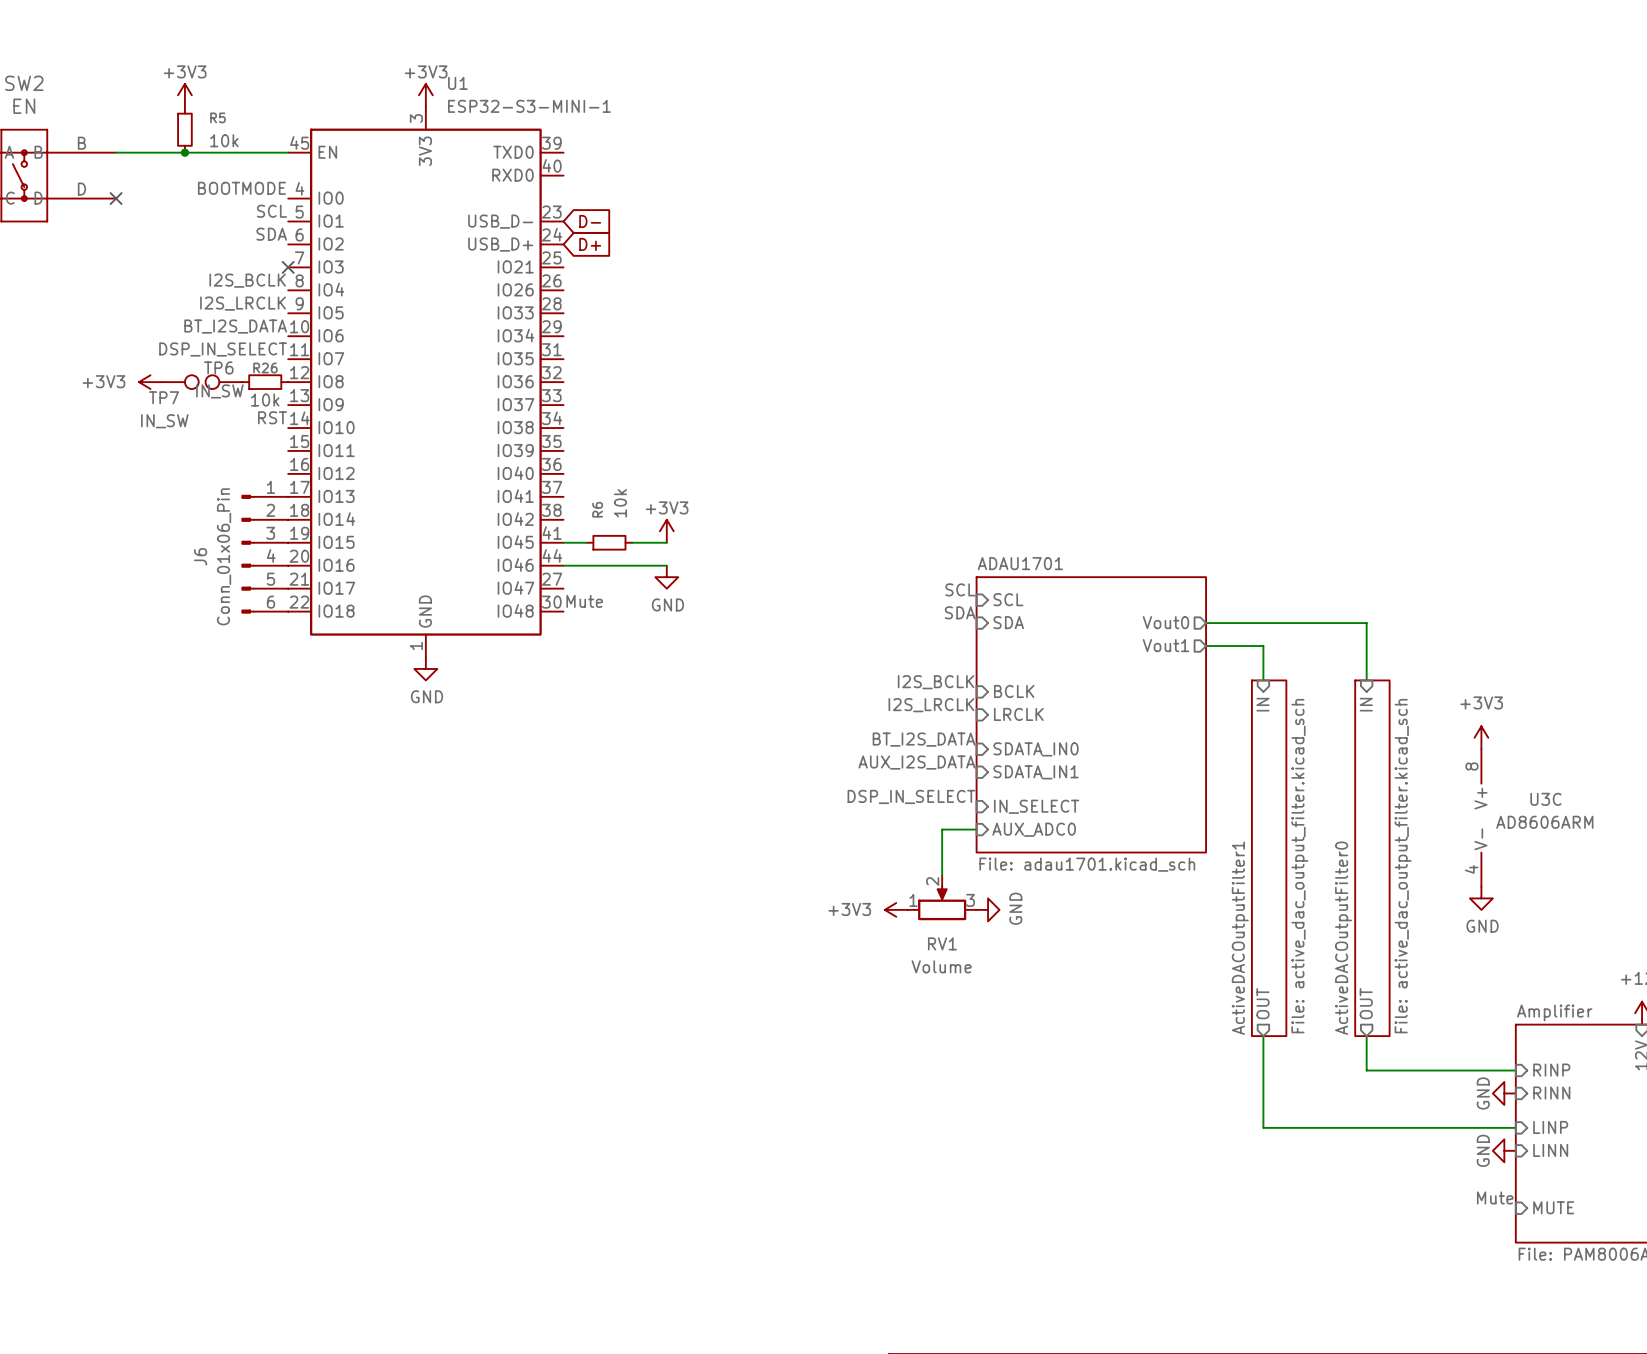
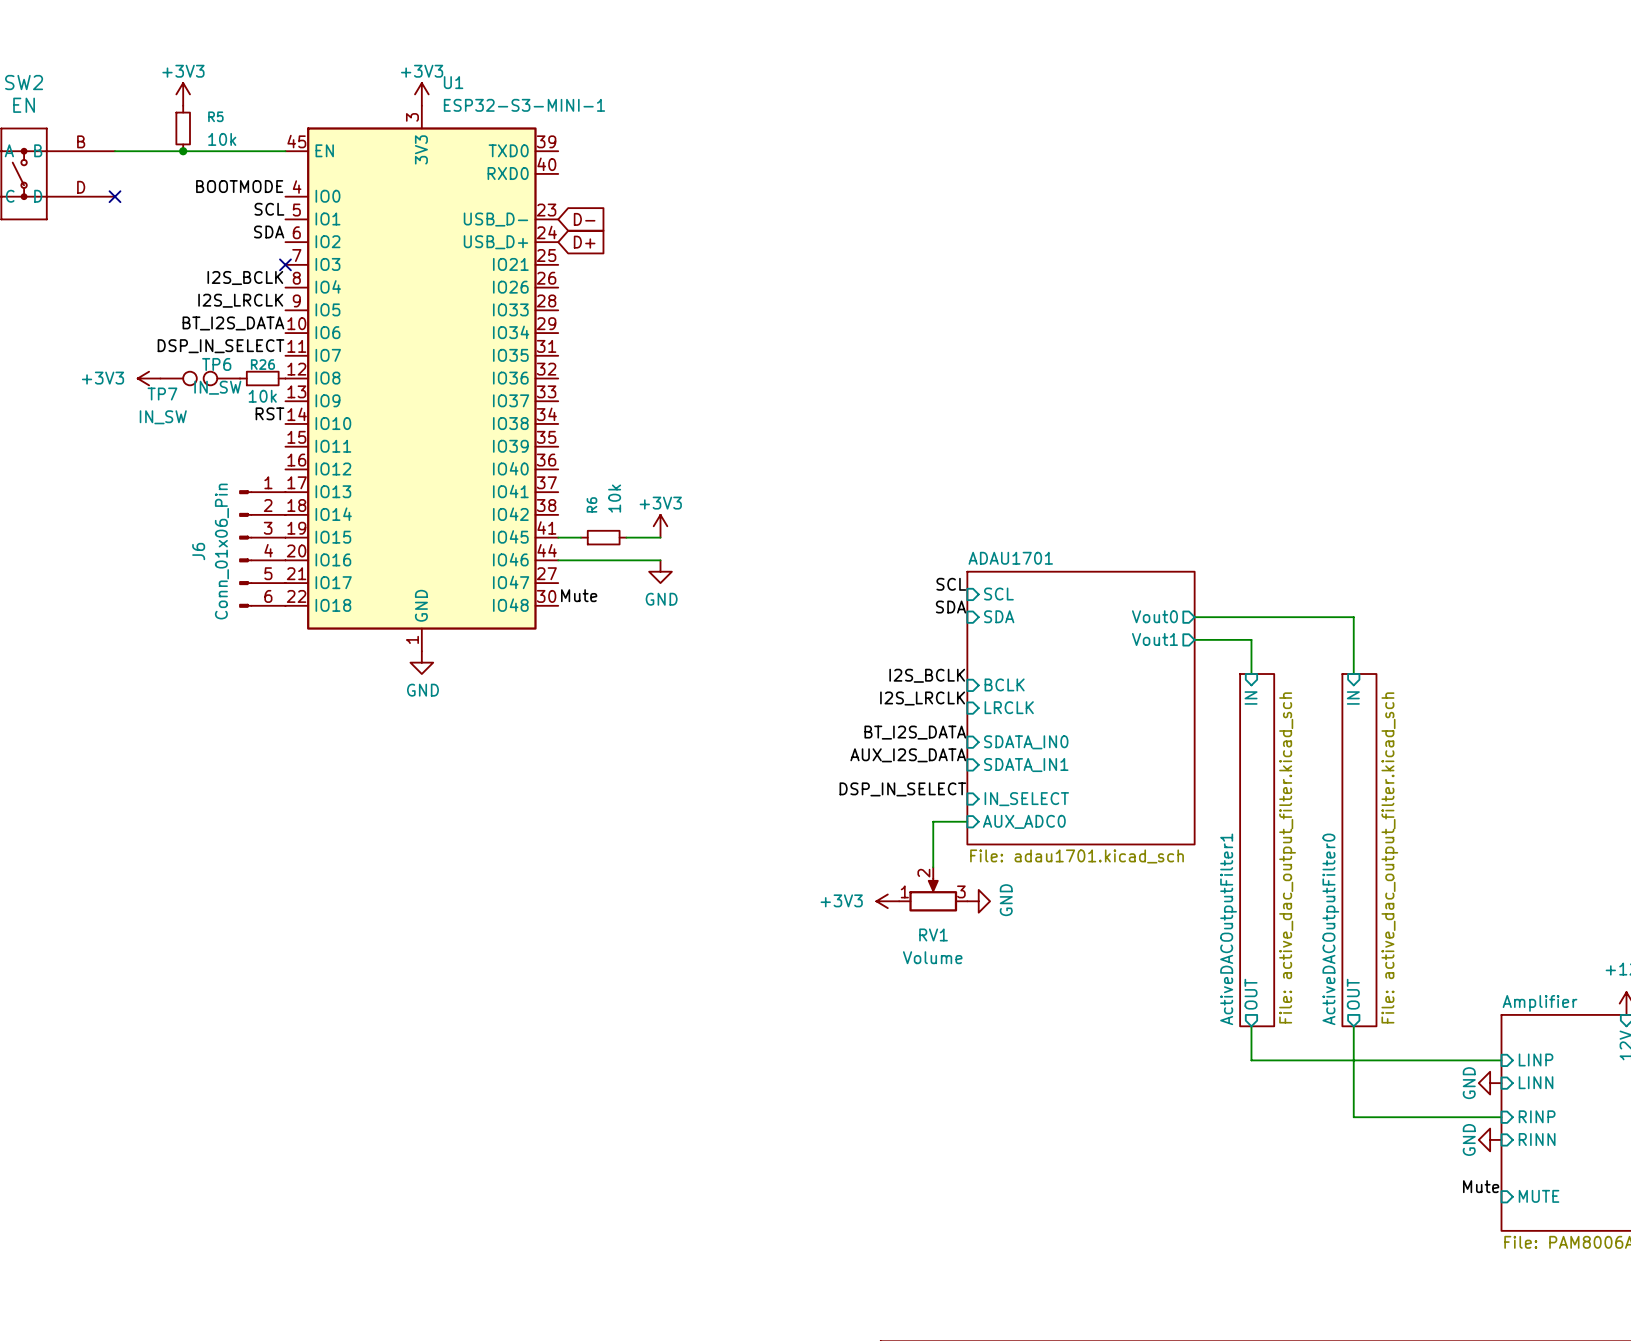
power symbol: +3V3 (1481, 737) -> none
U3C: AD8606ARM (1481, 818) -> none
power symbol: GND (1481, 898) -> none
wire: (1263, 1070) (1263, 1127) (1366, 1127) -> (1251, 1060) (1353, 1060) (1353, 1117)
sheet pin: RINP (1551, 1070) -> LINP (1536, 1059)
sheet pin: RINN (1551, 1093) -> LINN (1536, 1082)
sheet pin: LINP (1550, 1127) -> RINP (1537, 1116)
sheet pin: LINN (1550, 1150) -> RINN (1537, 1139)

